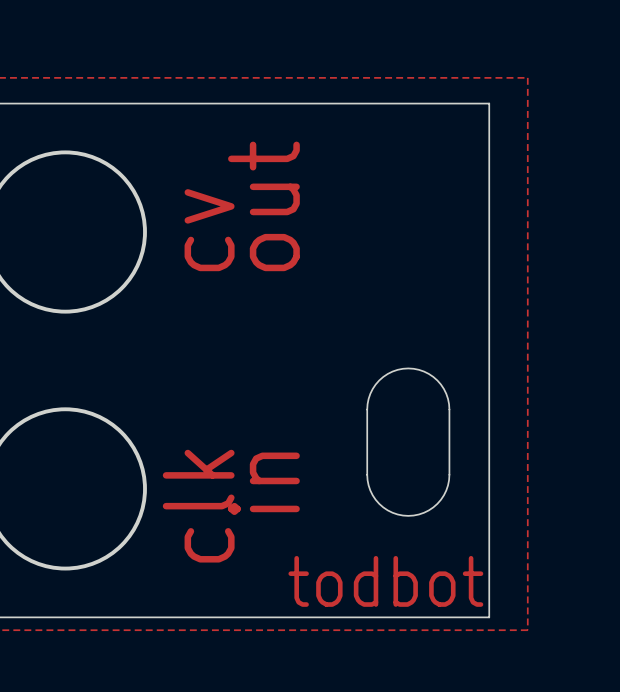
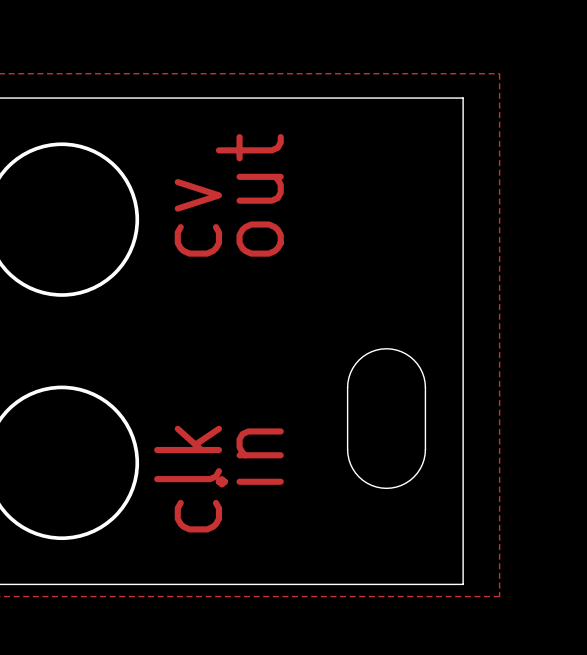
text: todbot (385, 581) -> none

